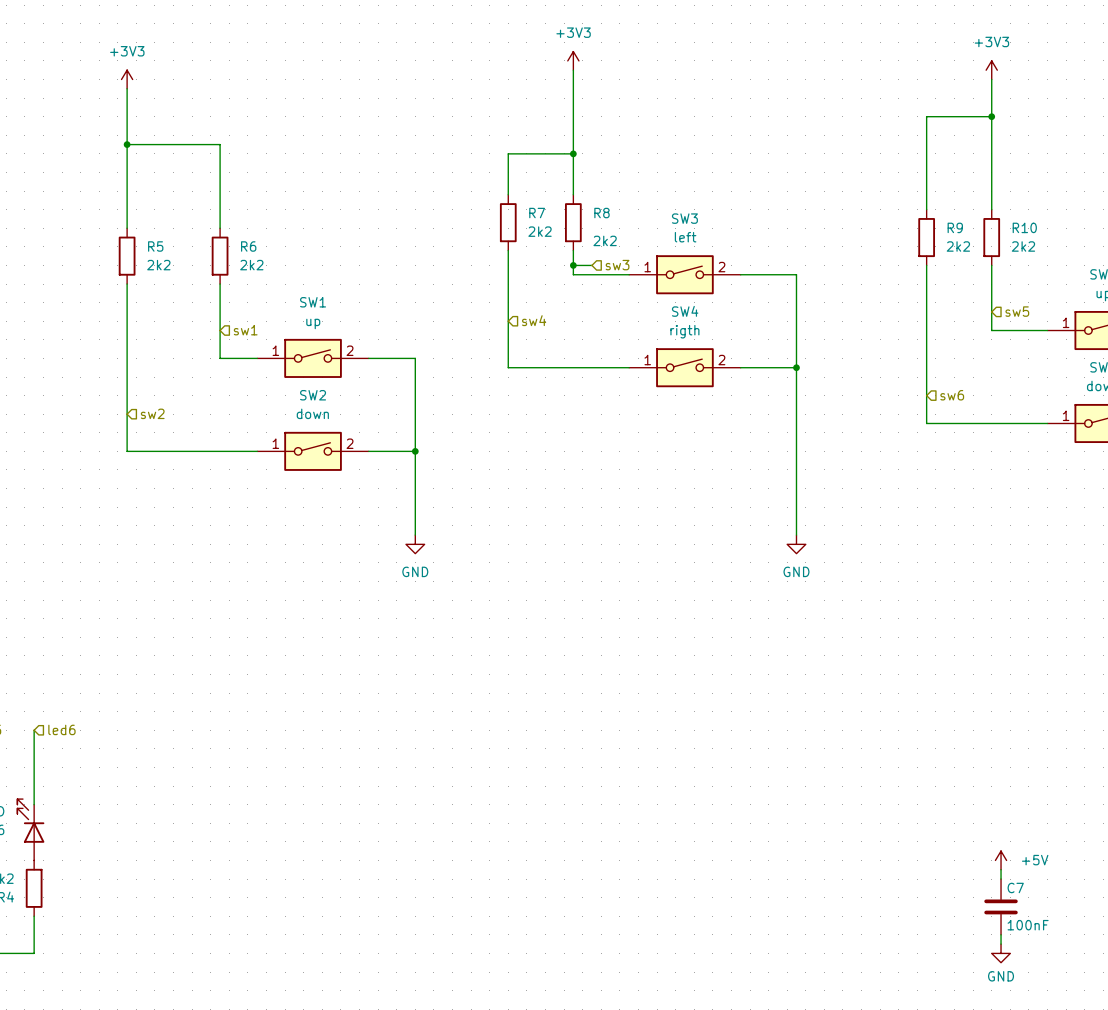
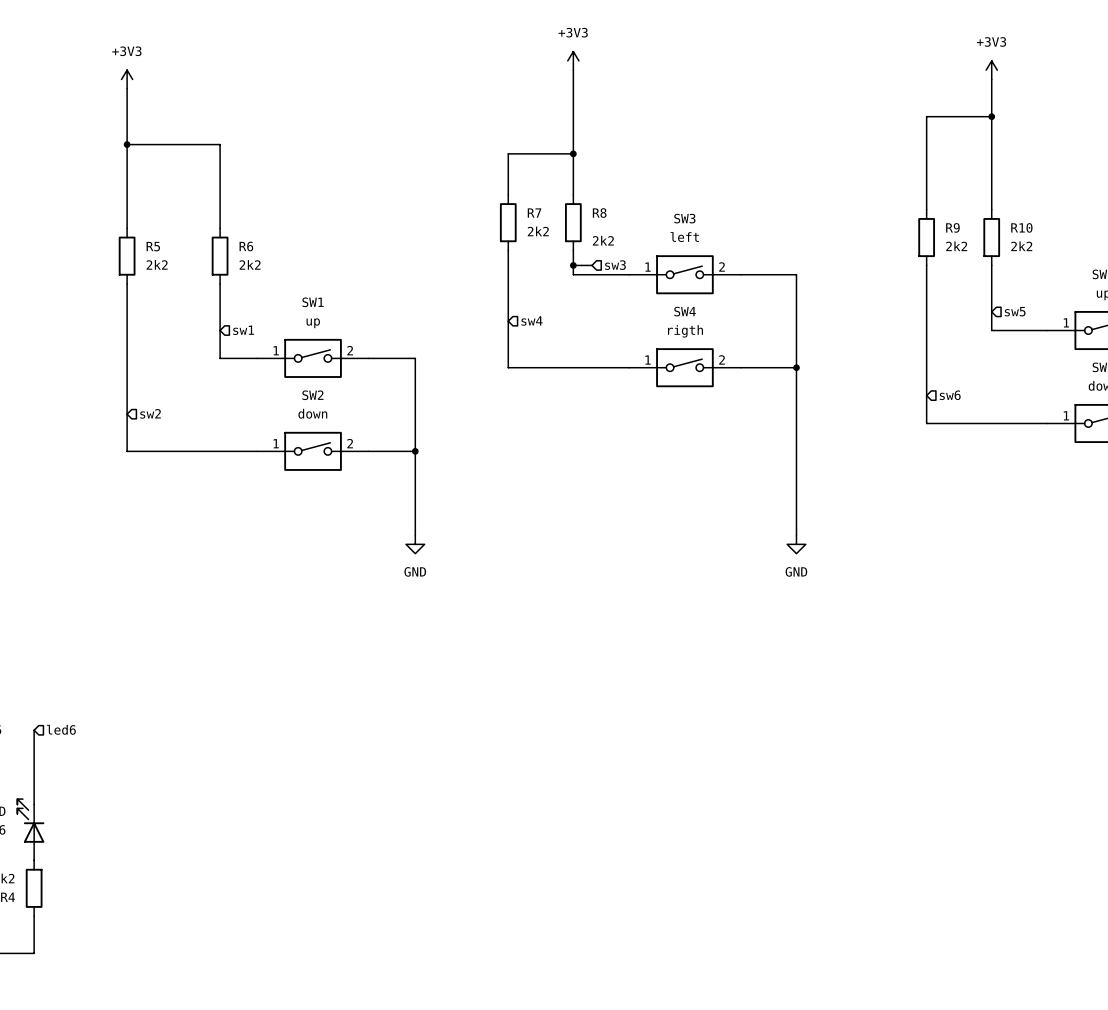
power symbol: +5V (1001, 860) -> none
wire: (1001, 869) (1001, 879) -> none
C7: 100nF (1001, 906) -> none
wire: (1001, 934) (1001, 944) -> none
power symbol: GND (1001, 953) -> none

